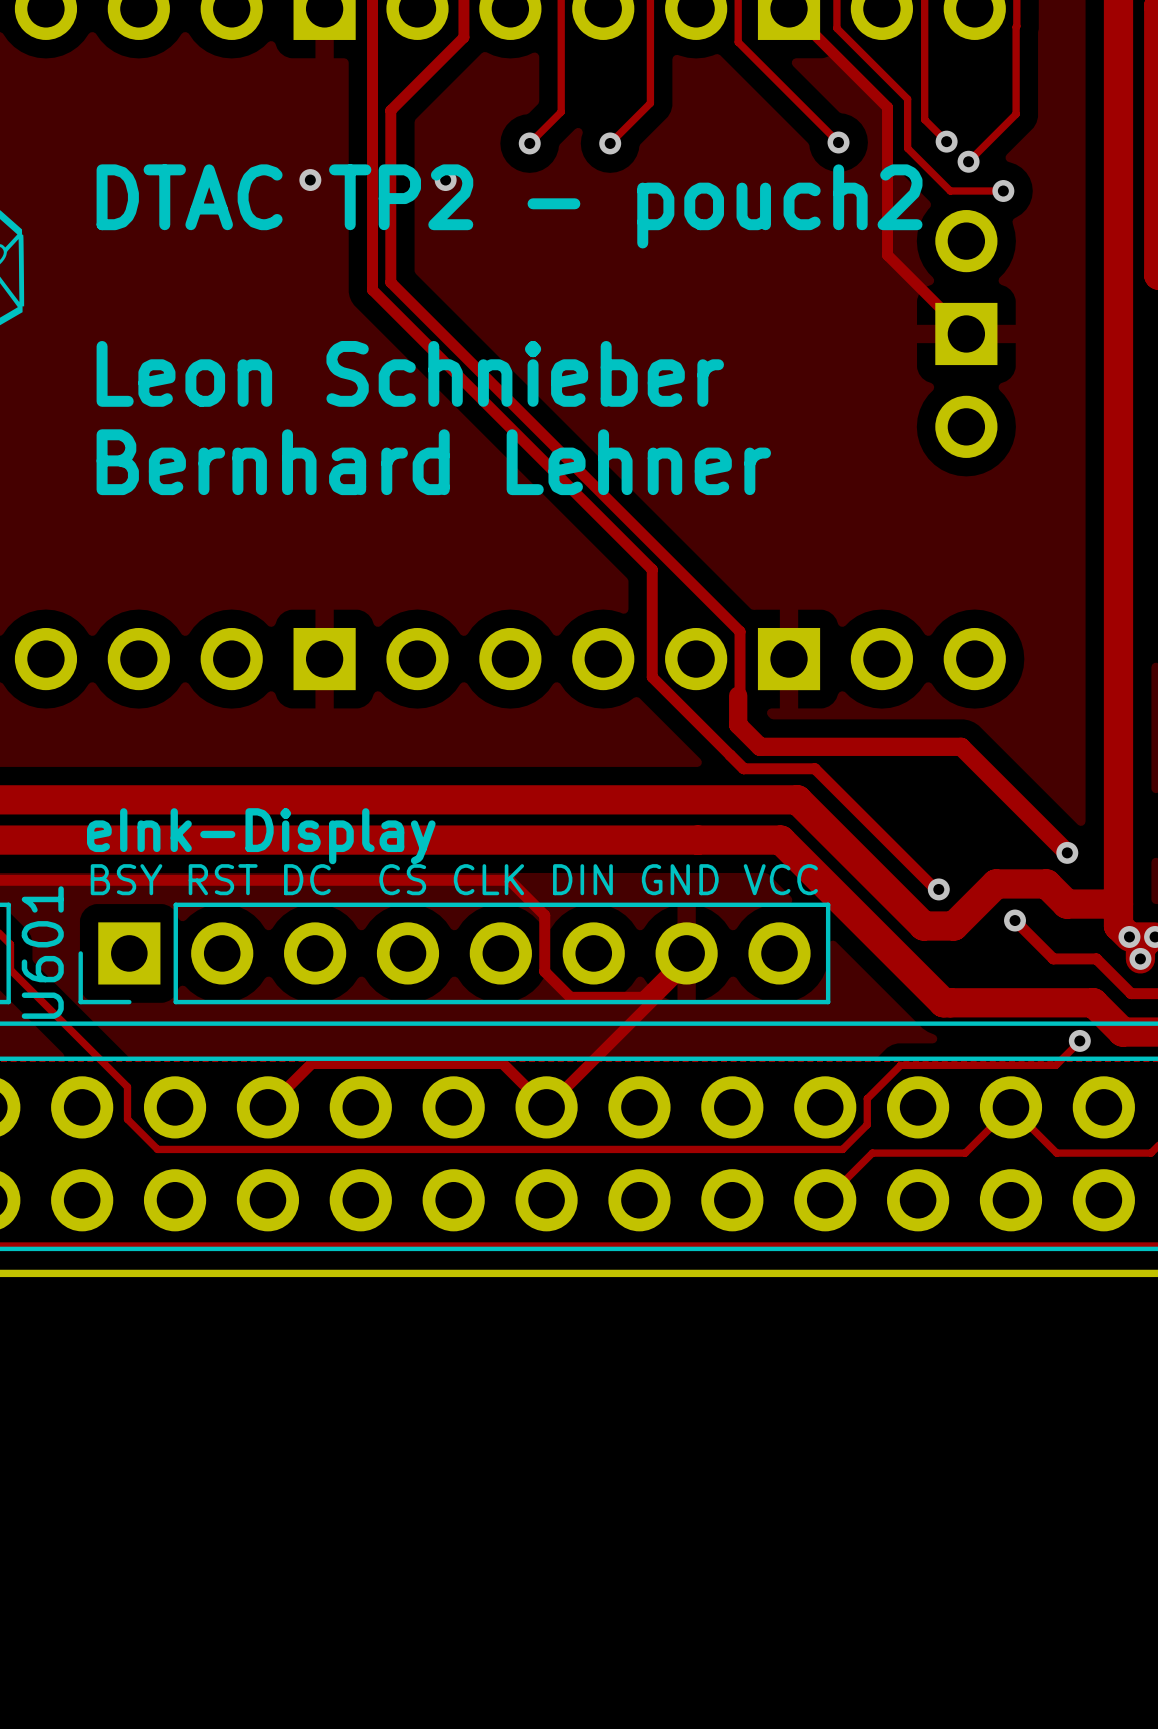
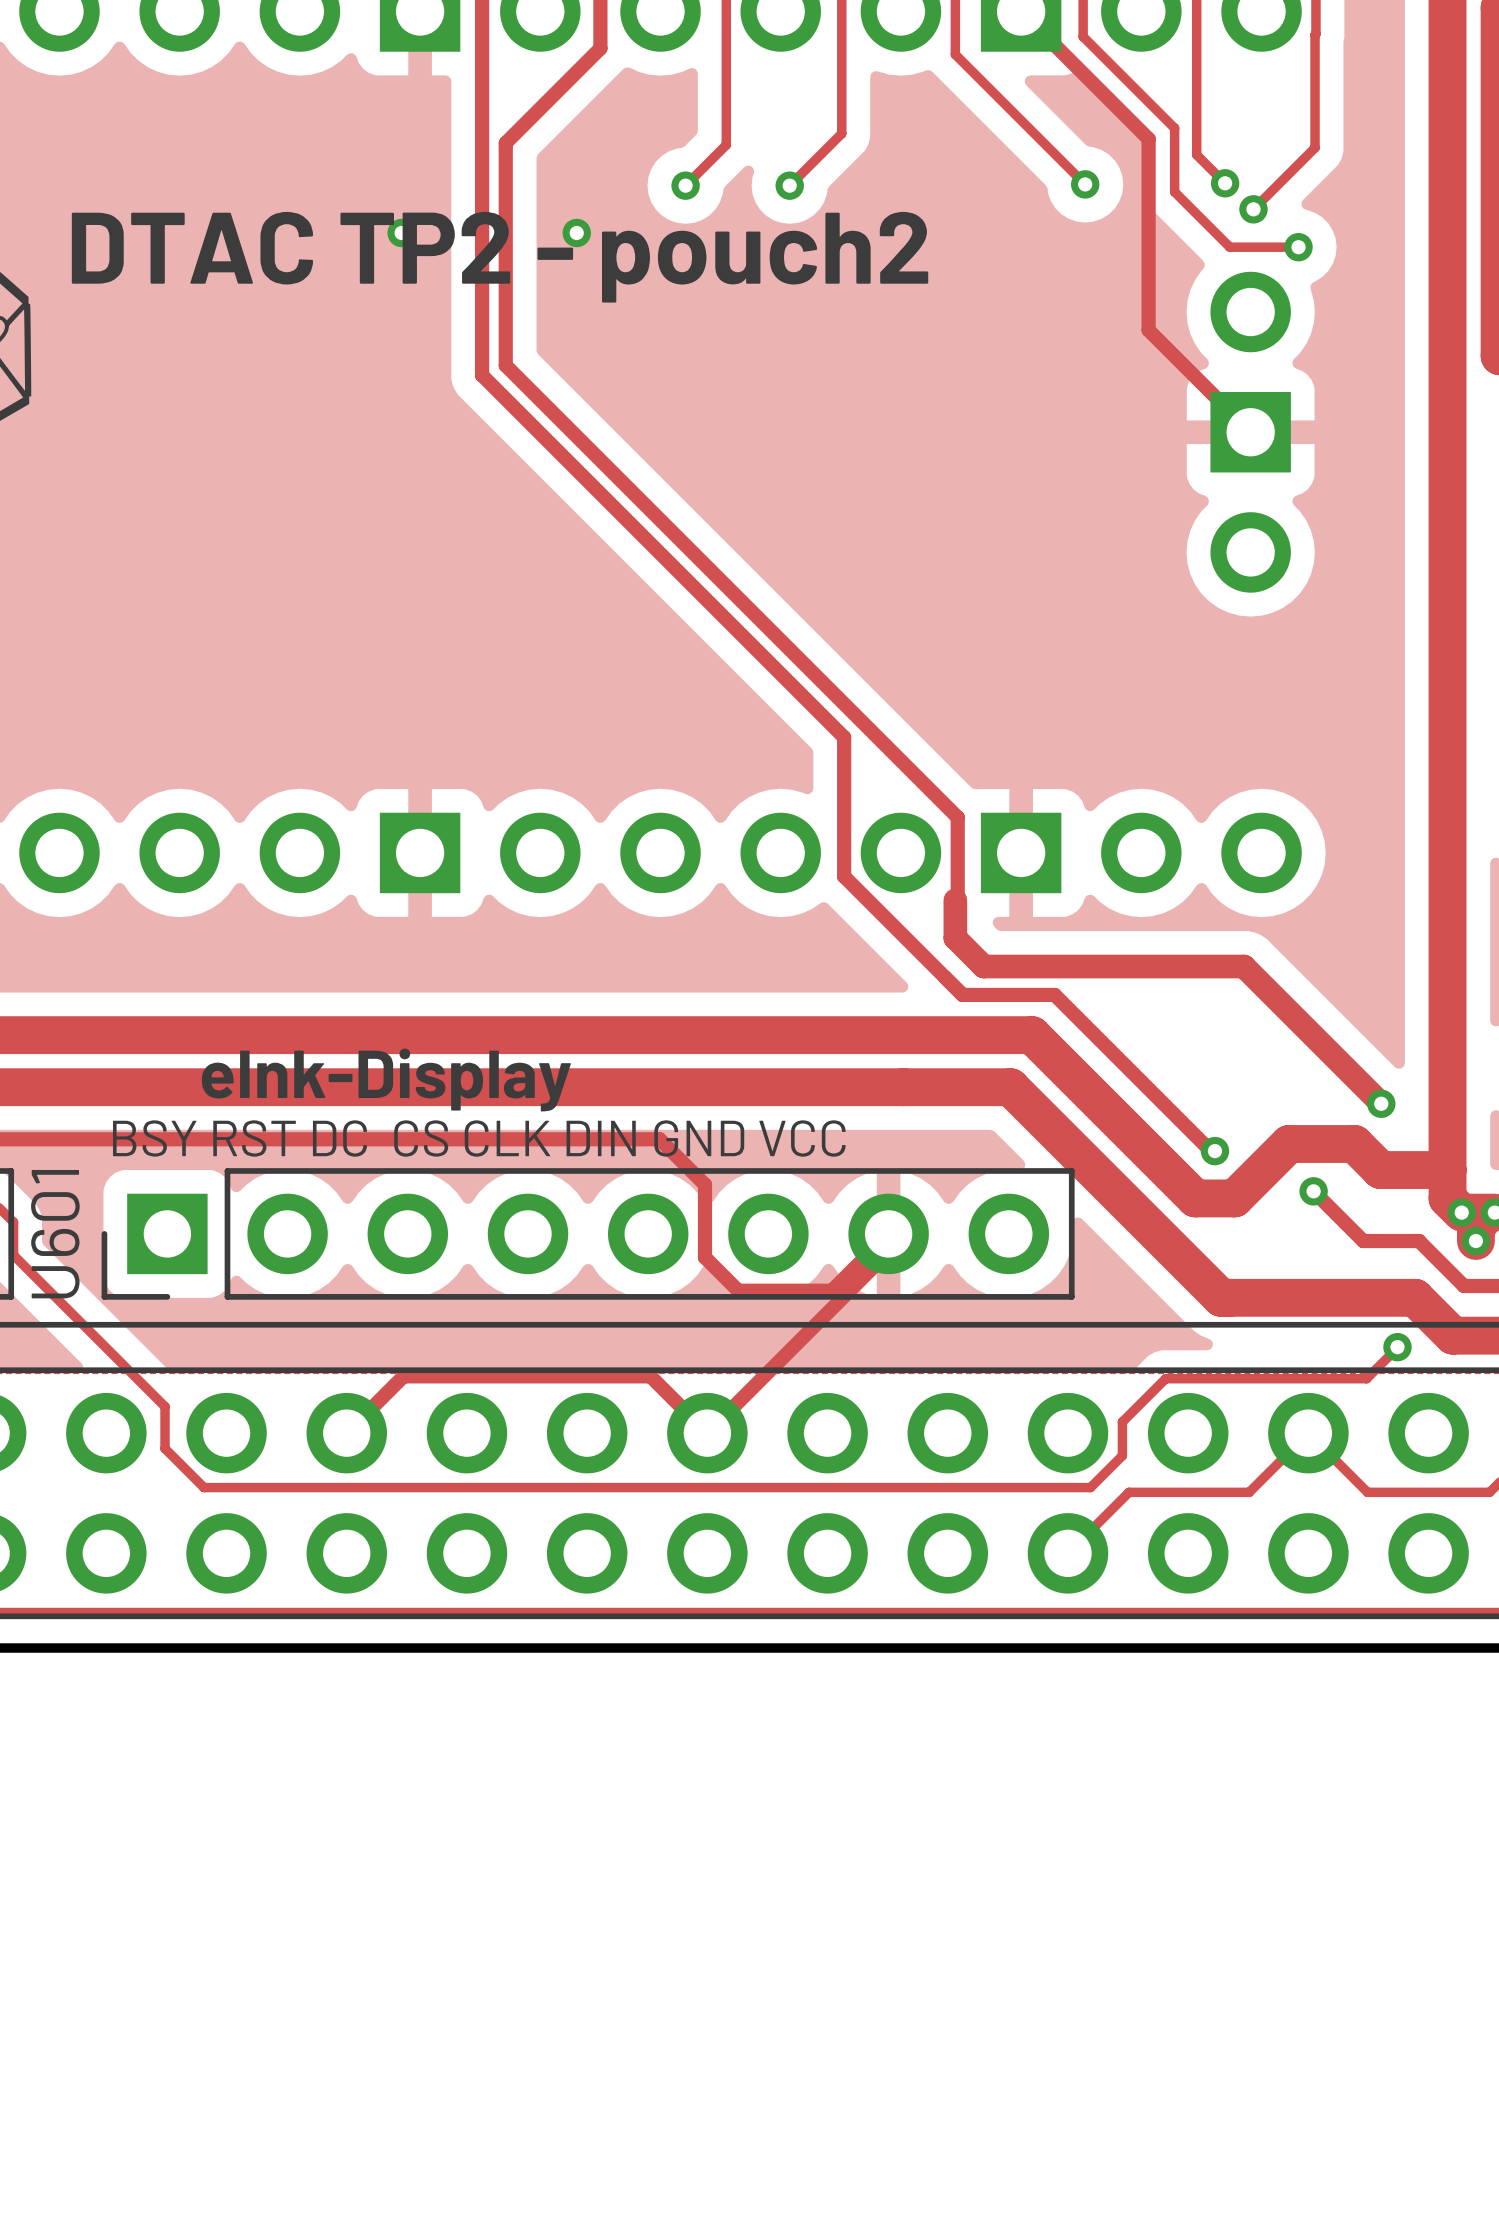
text position: DTAC TP2 - pouch2 (509, 206) -> DTAC TP2 - pouch2 (500, 257)
text: Leon Schnieber (410, 373) -> none
text: Bernhard Lehner (433, 462) -> none

